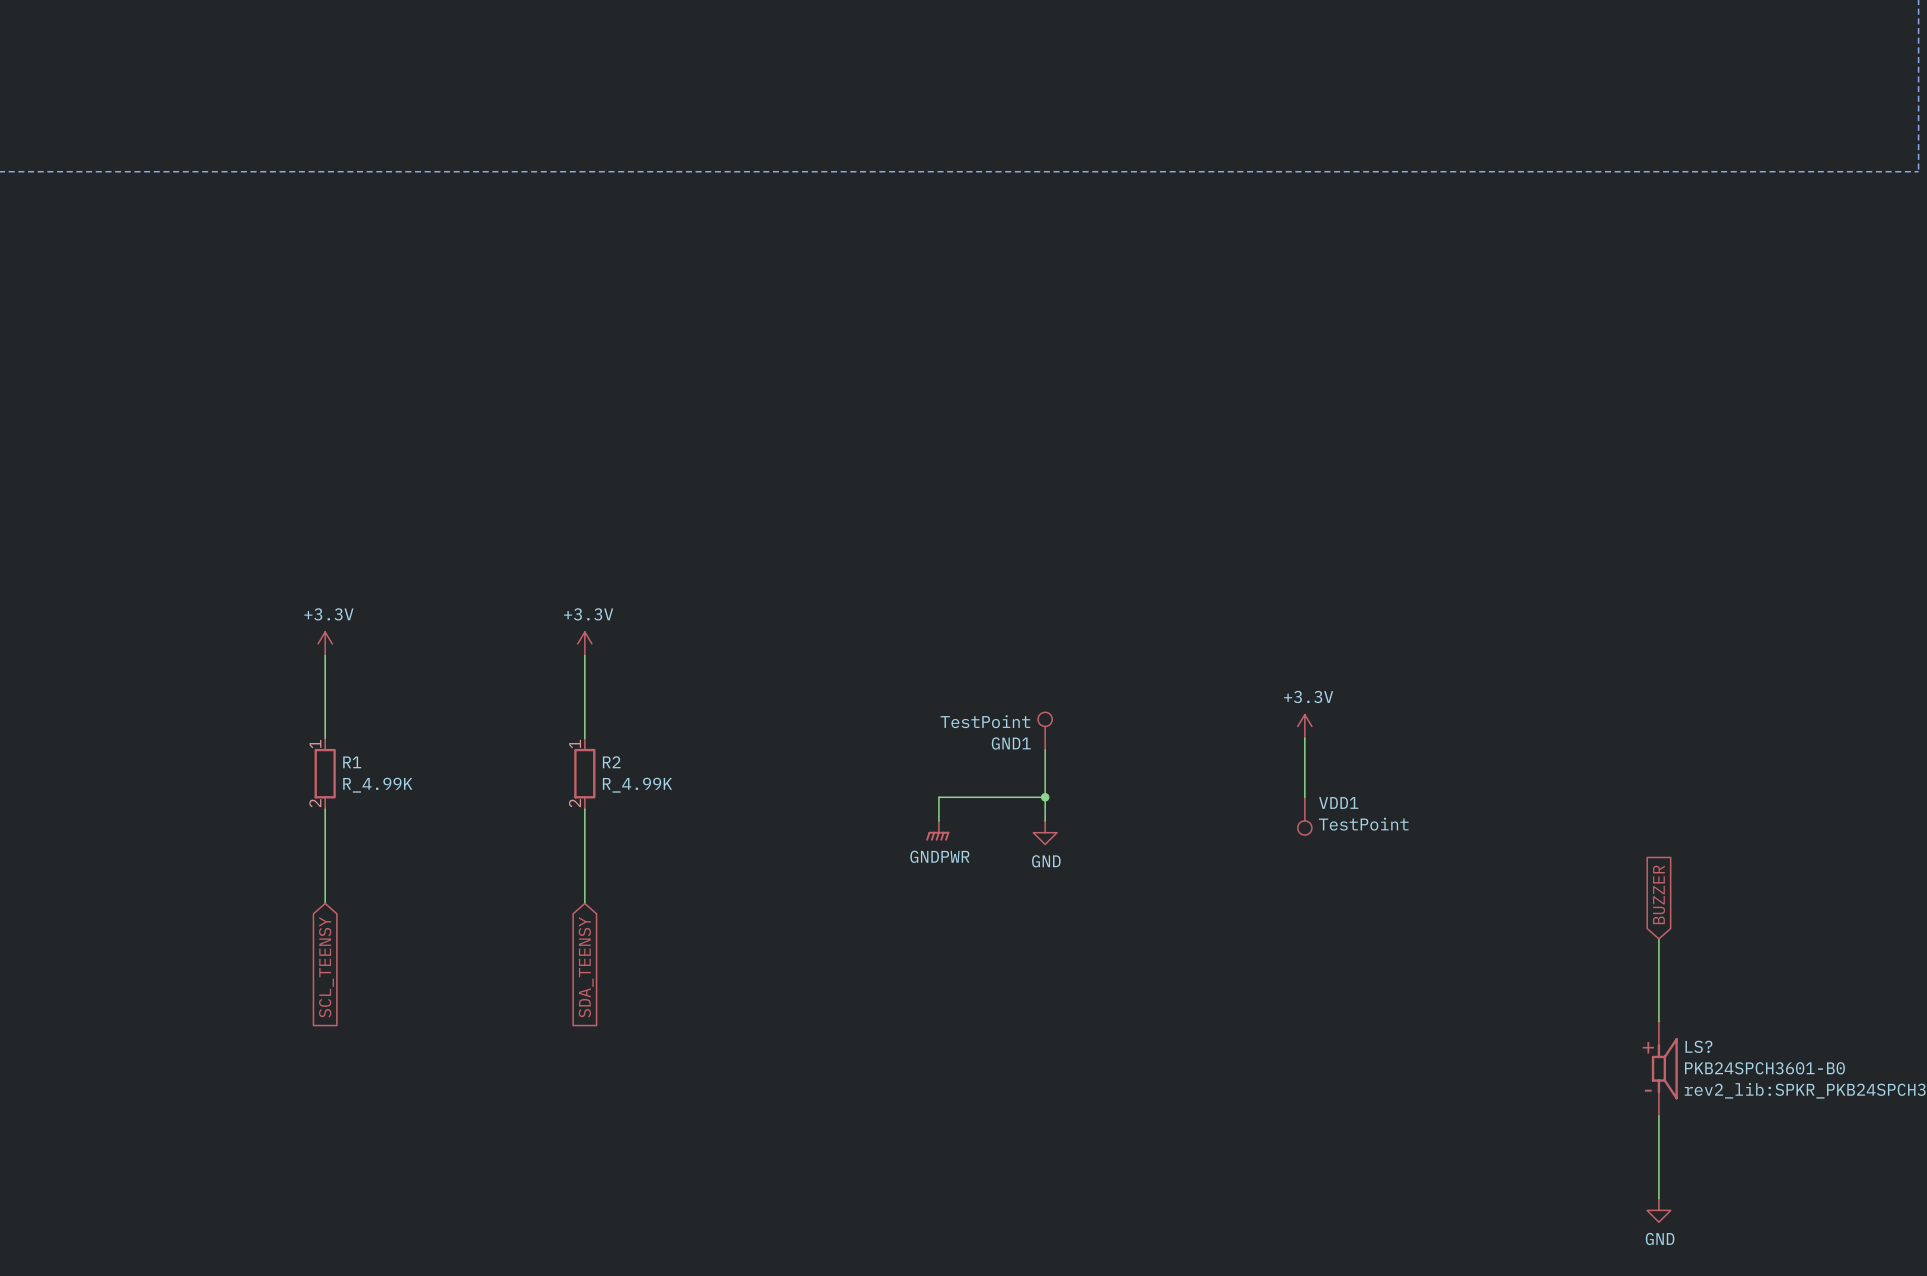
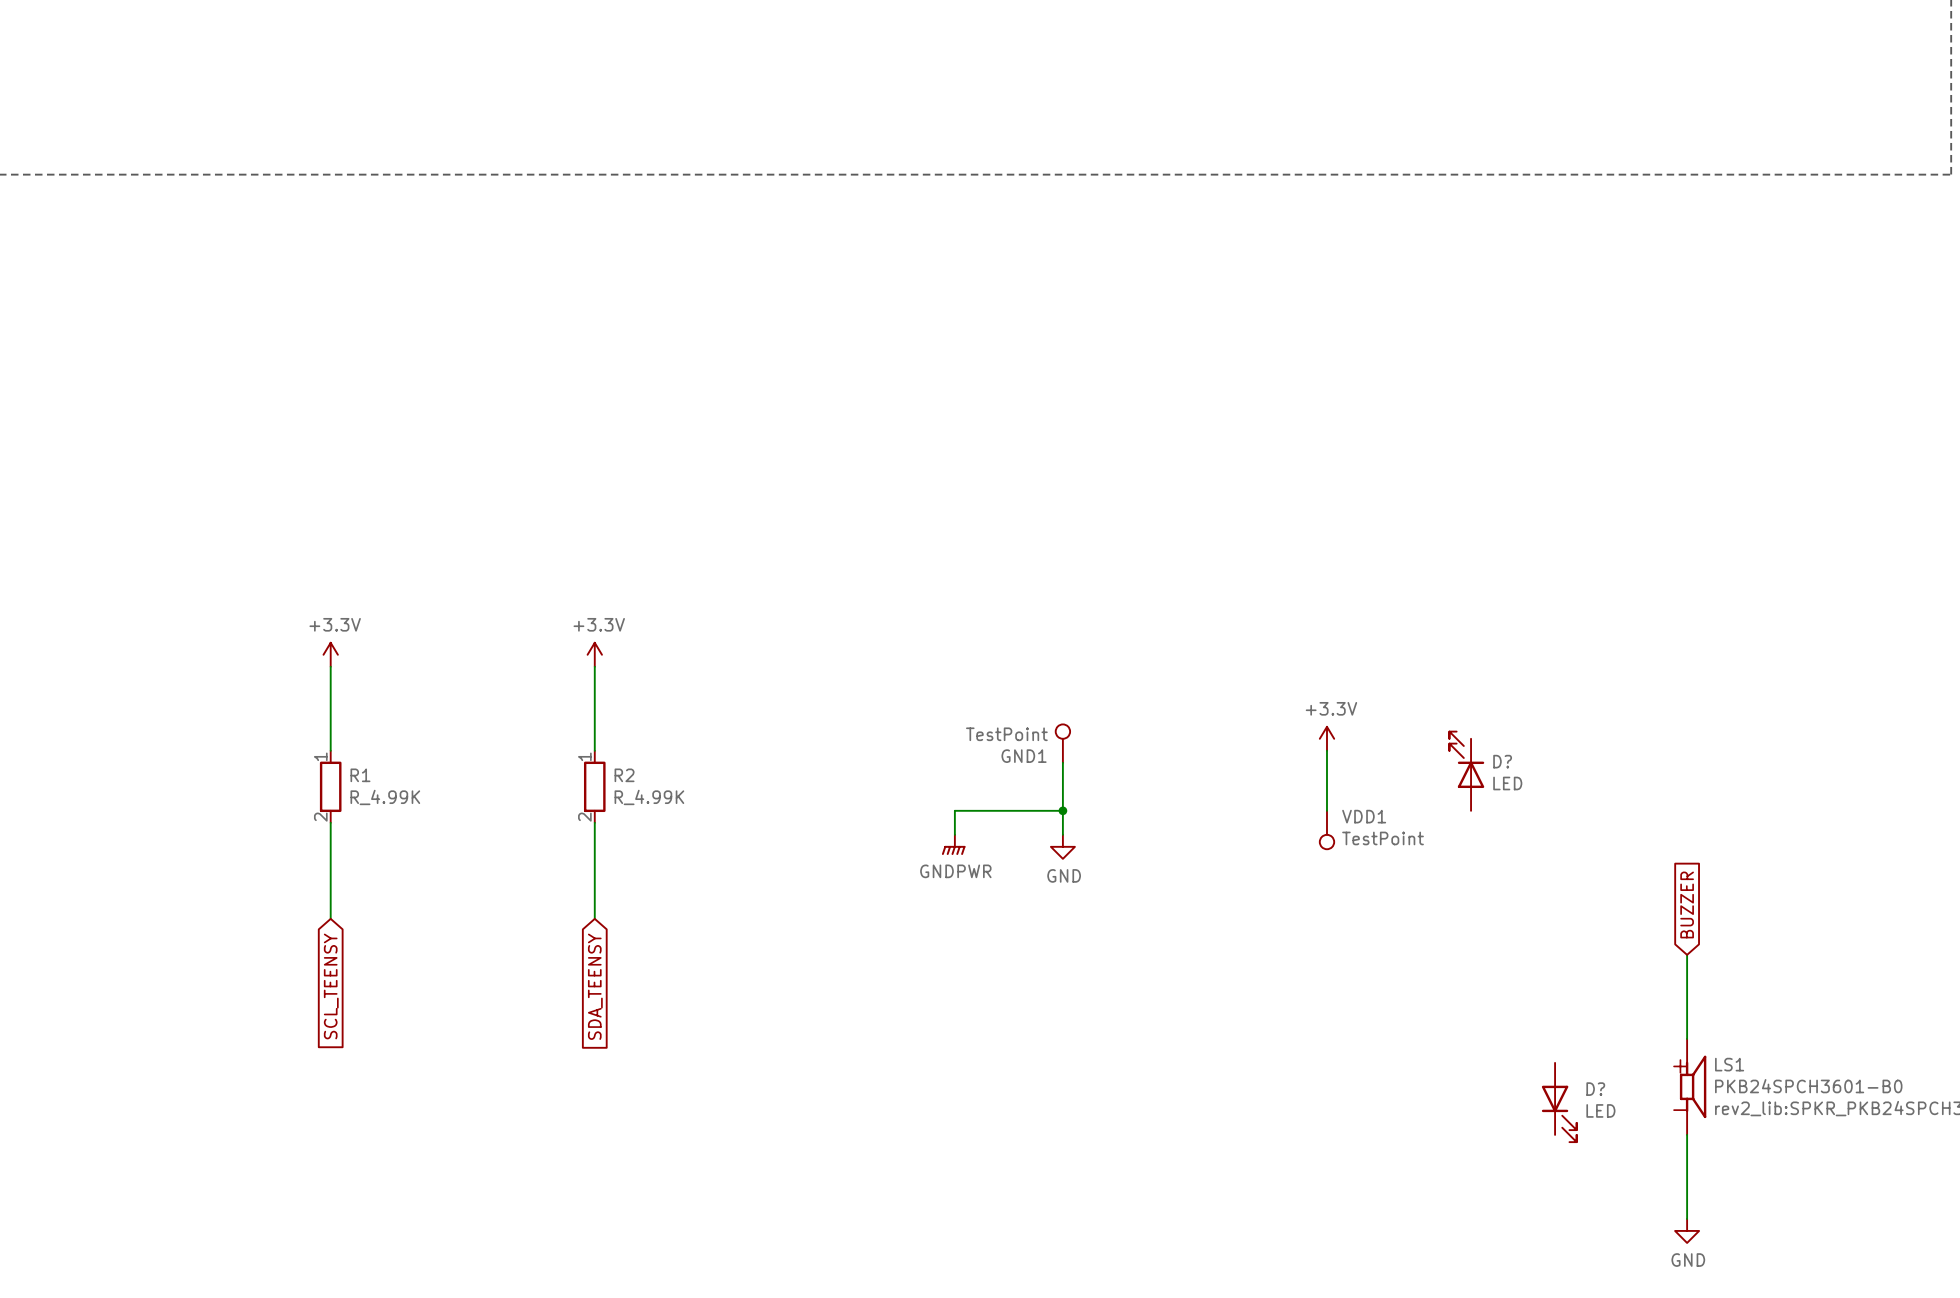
D?: none -> LED (1466, 771)
LS? name: LS? (1698, 1046) -> LS1 (1729, 1064)
D?: none -> LED (1559, 1102)

